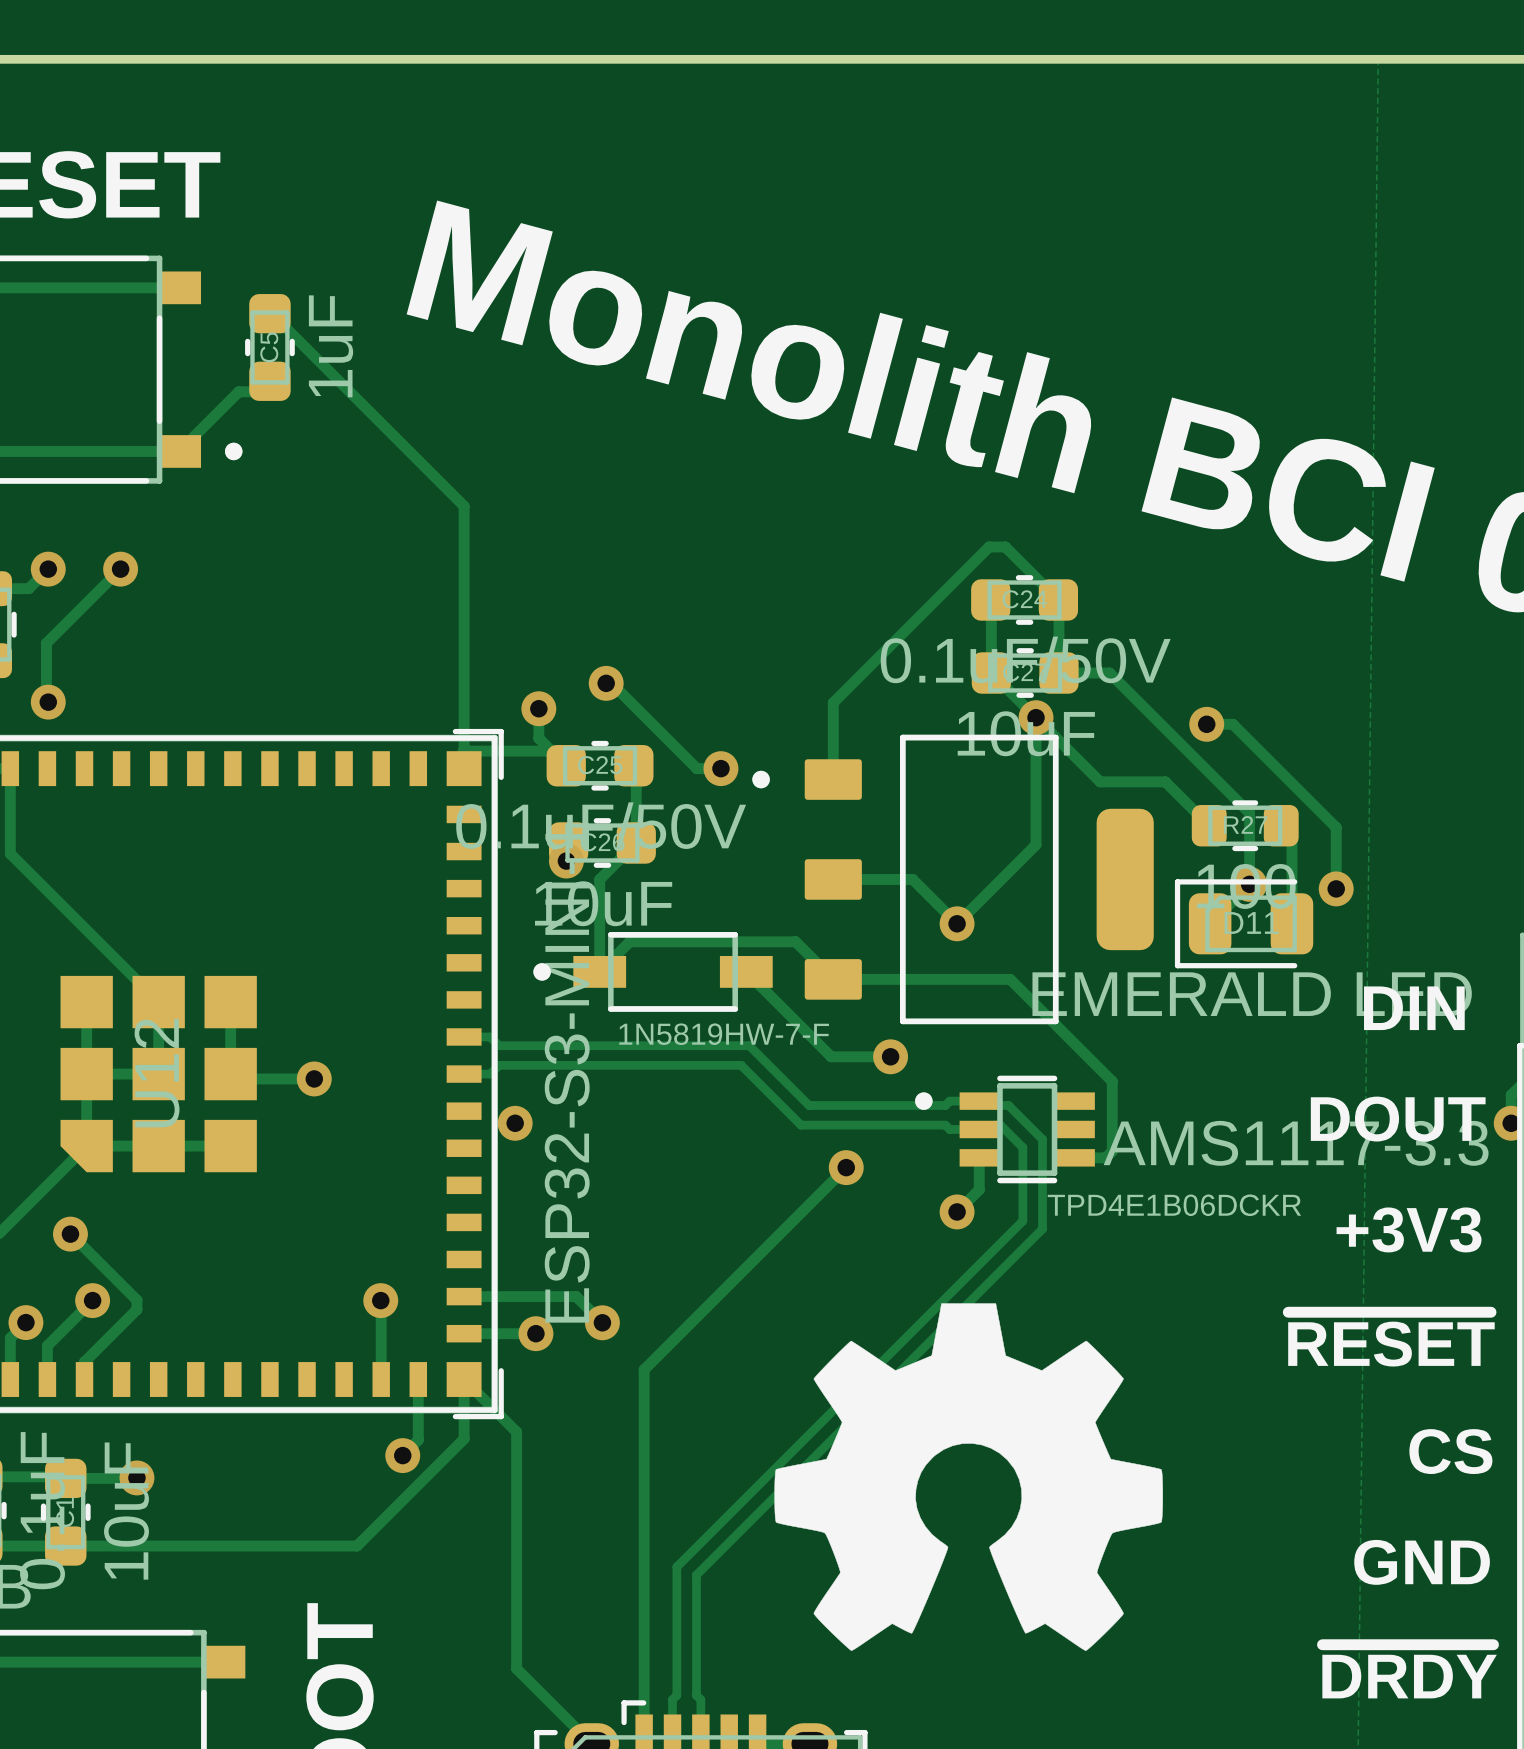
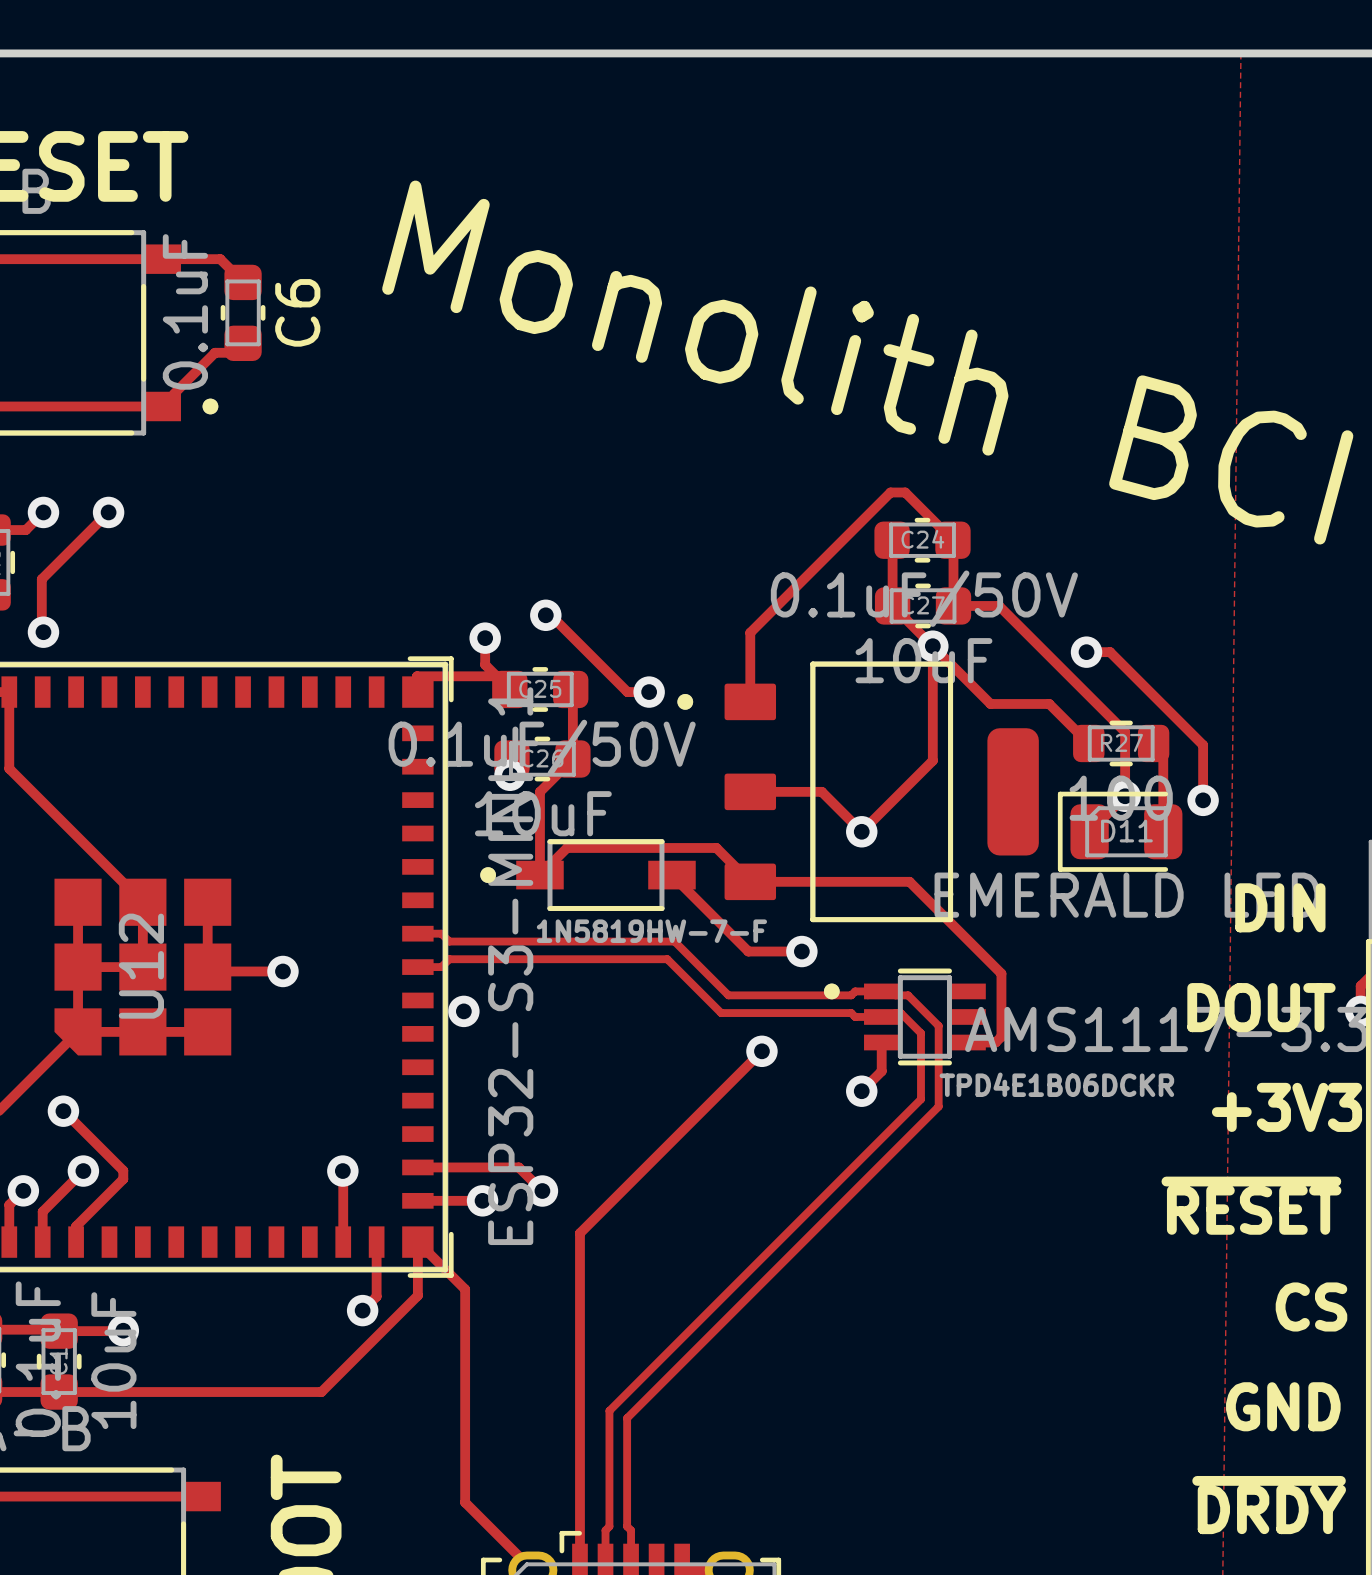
track: (269, 313) (464, 506) (464, 768) -> (243, 281) (220, 259) (161, 259)
C5 value: 1uF (331, 346) -> 0.1uF (185, 311)
C5 name: C5 (269, 347) -> C6 (297, 312)
drawing: [774, 1303, 1163, 1651] -> none

